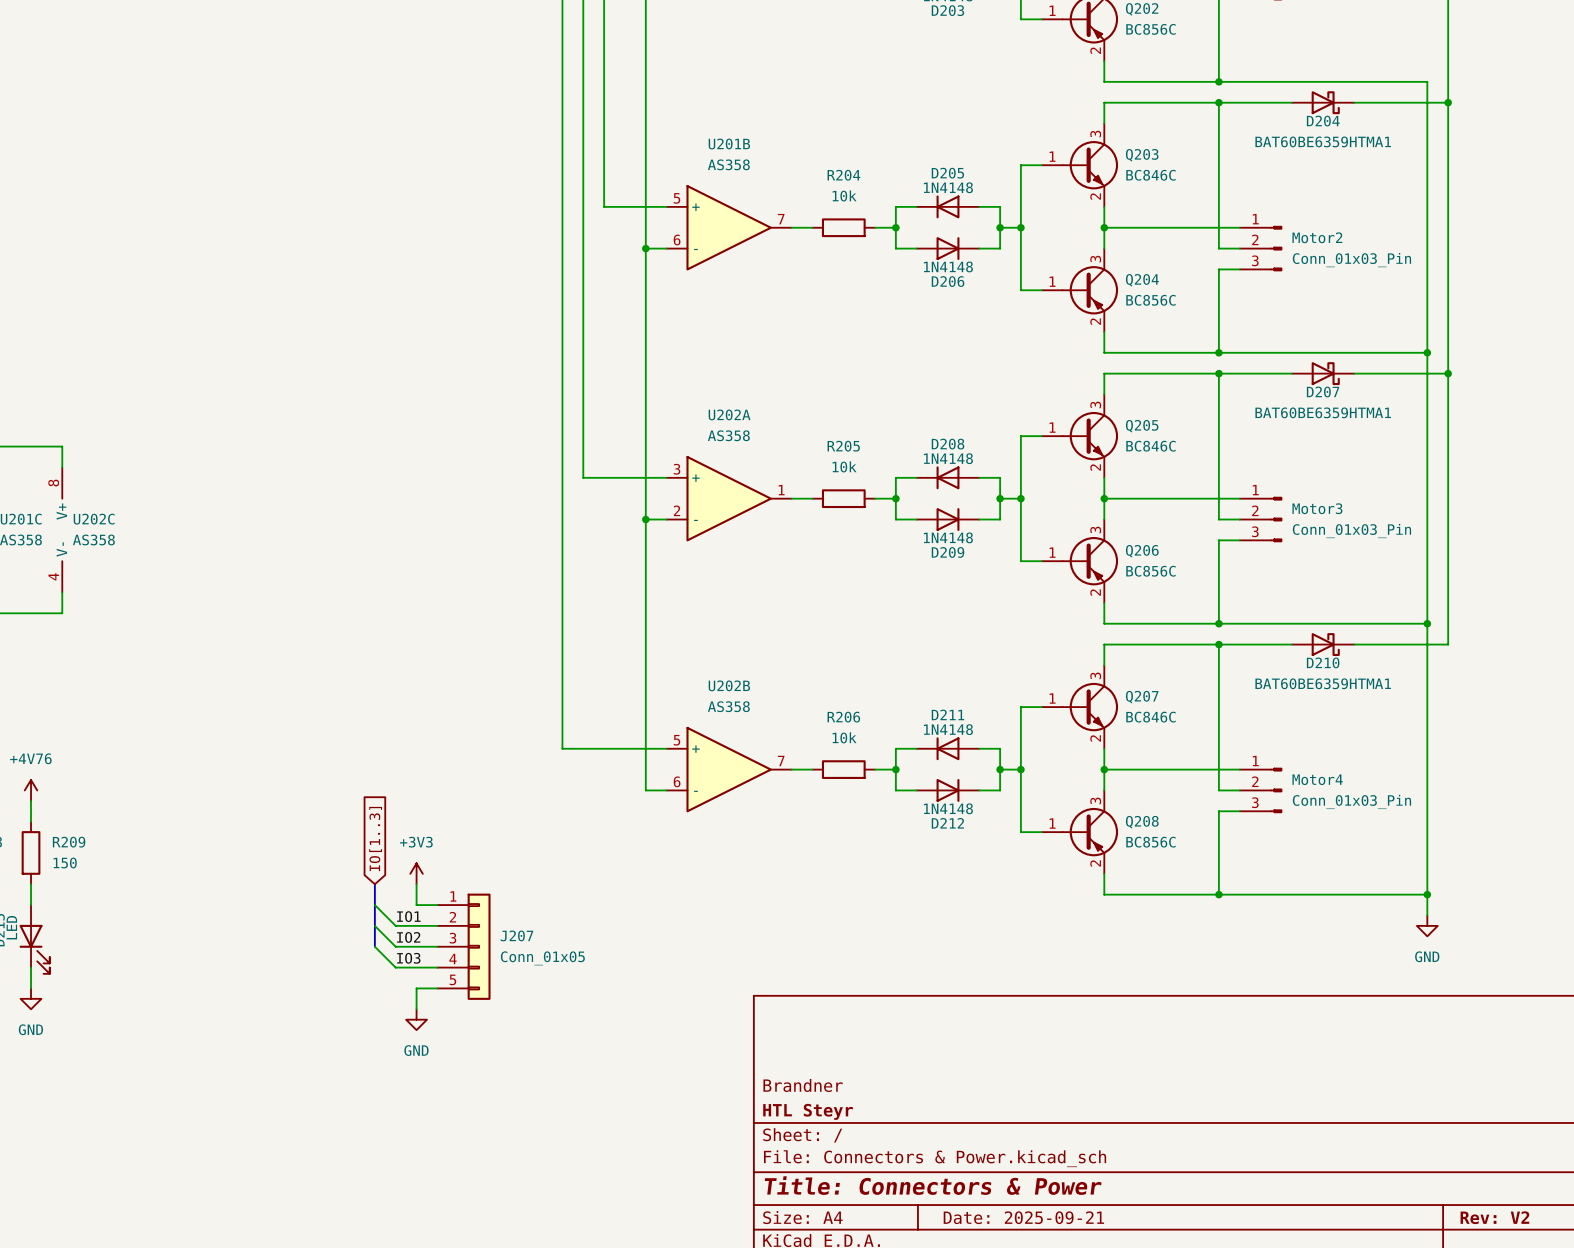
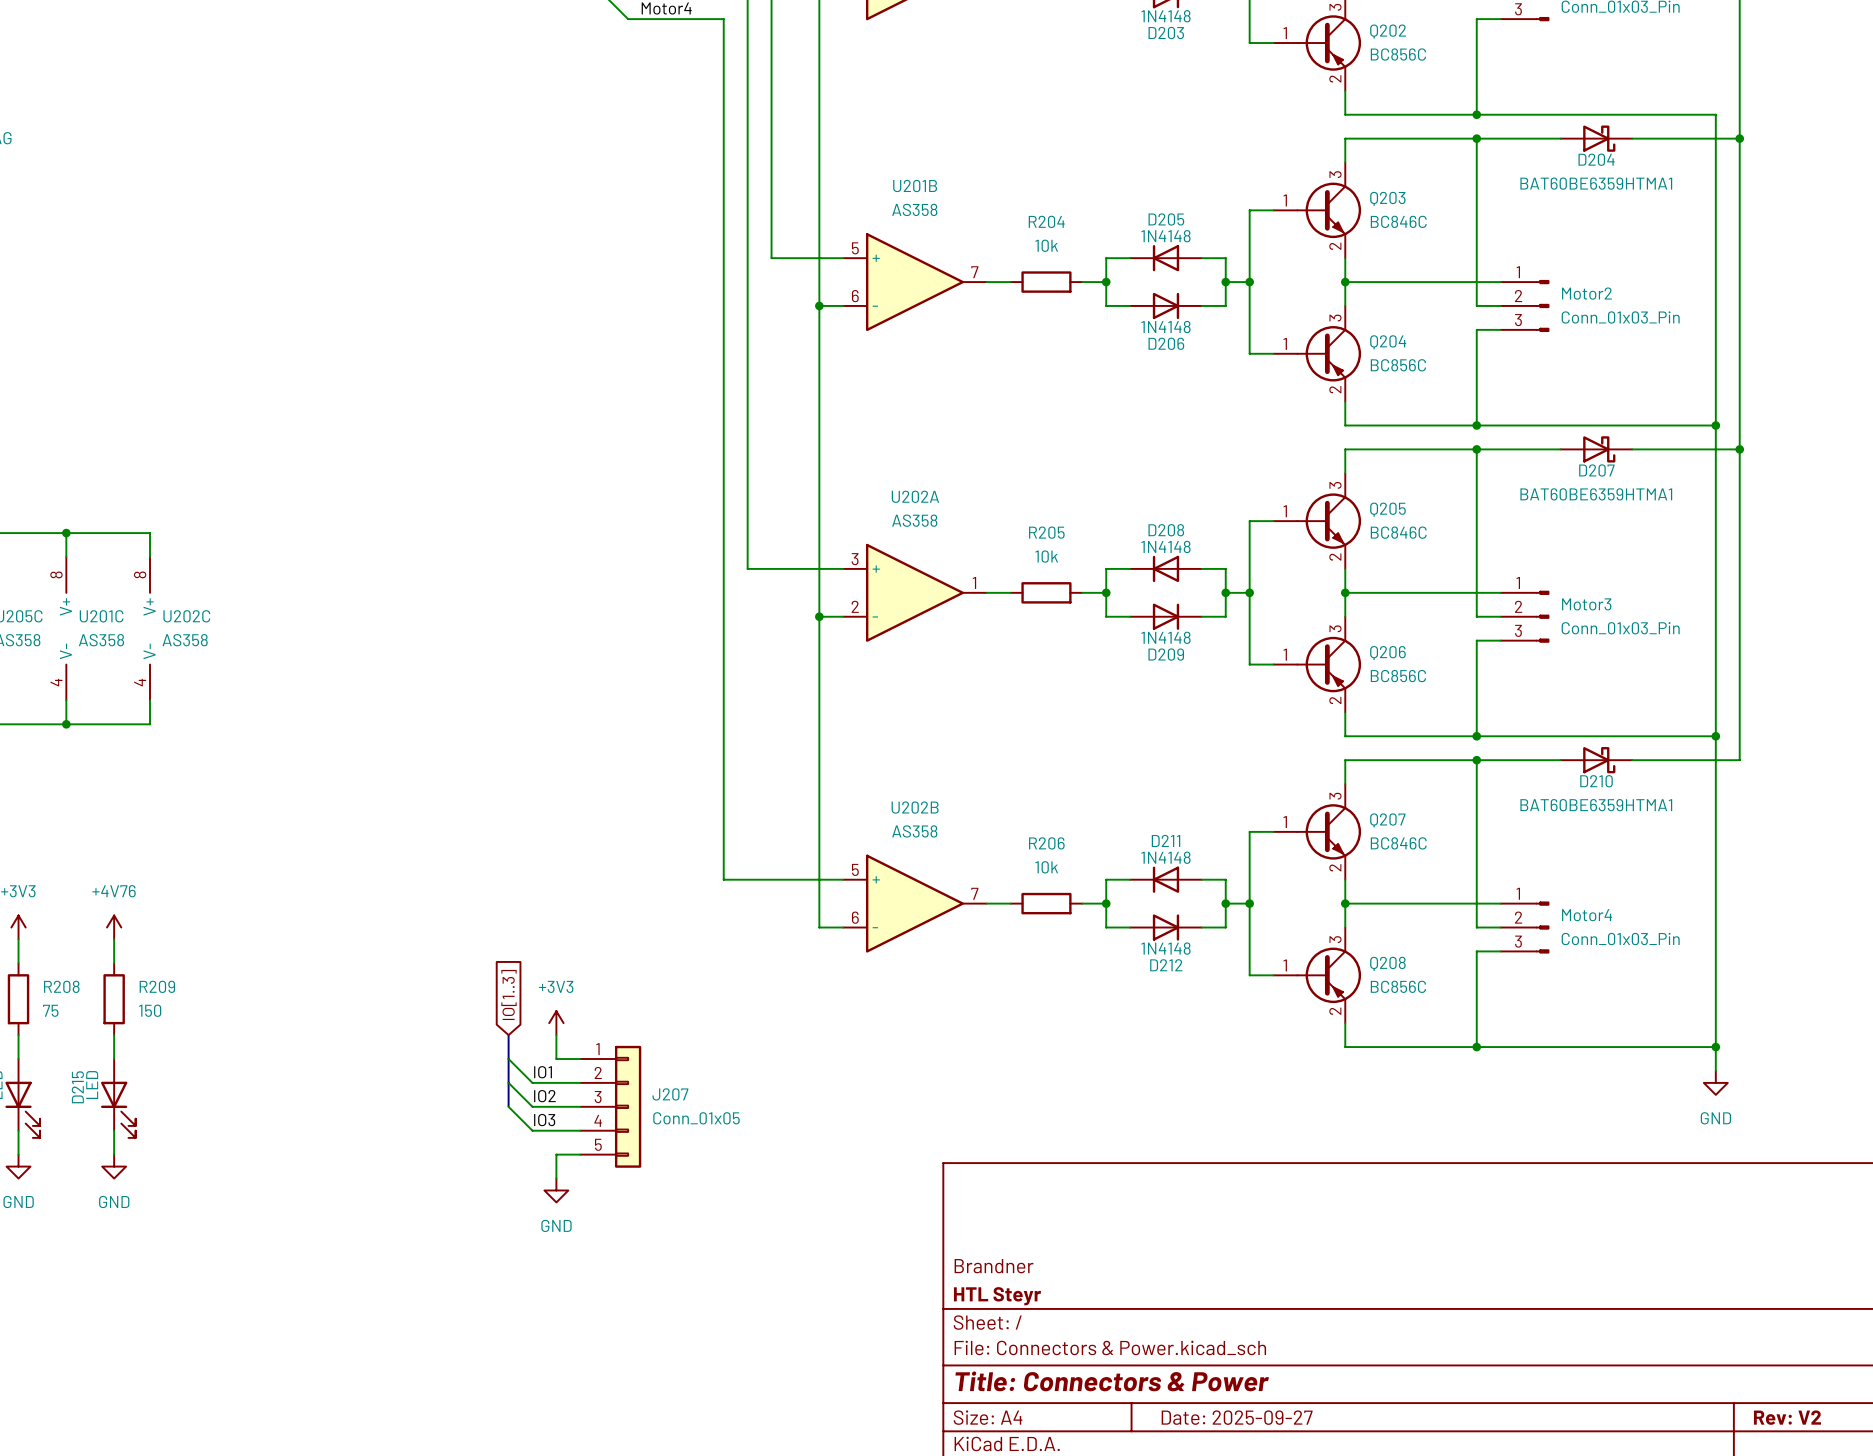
title block: Date: 2025-09-21 (1023, 1217) -> Date: 2025-09-27 (1237, 1417)

